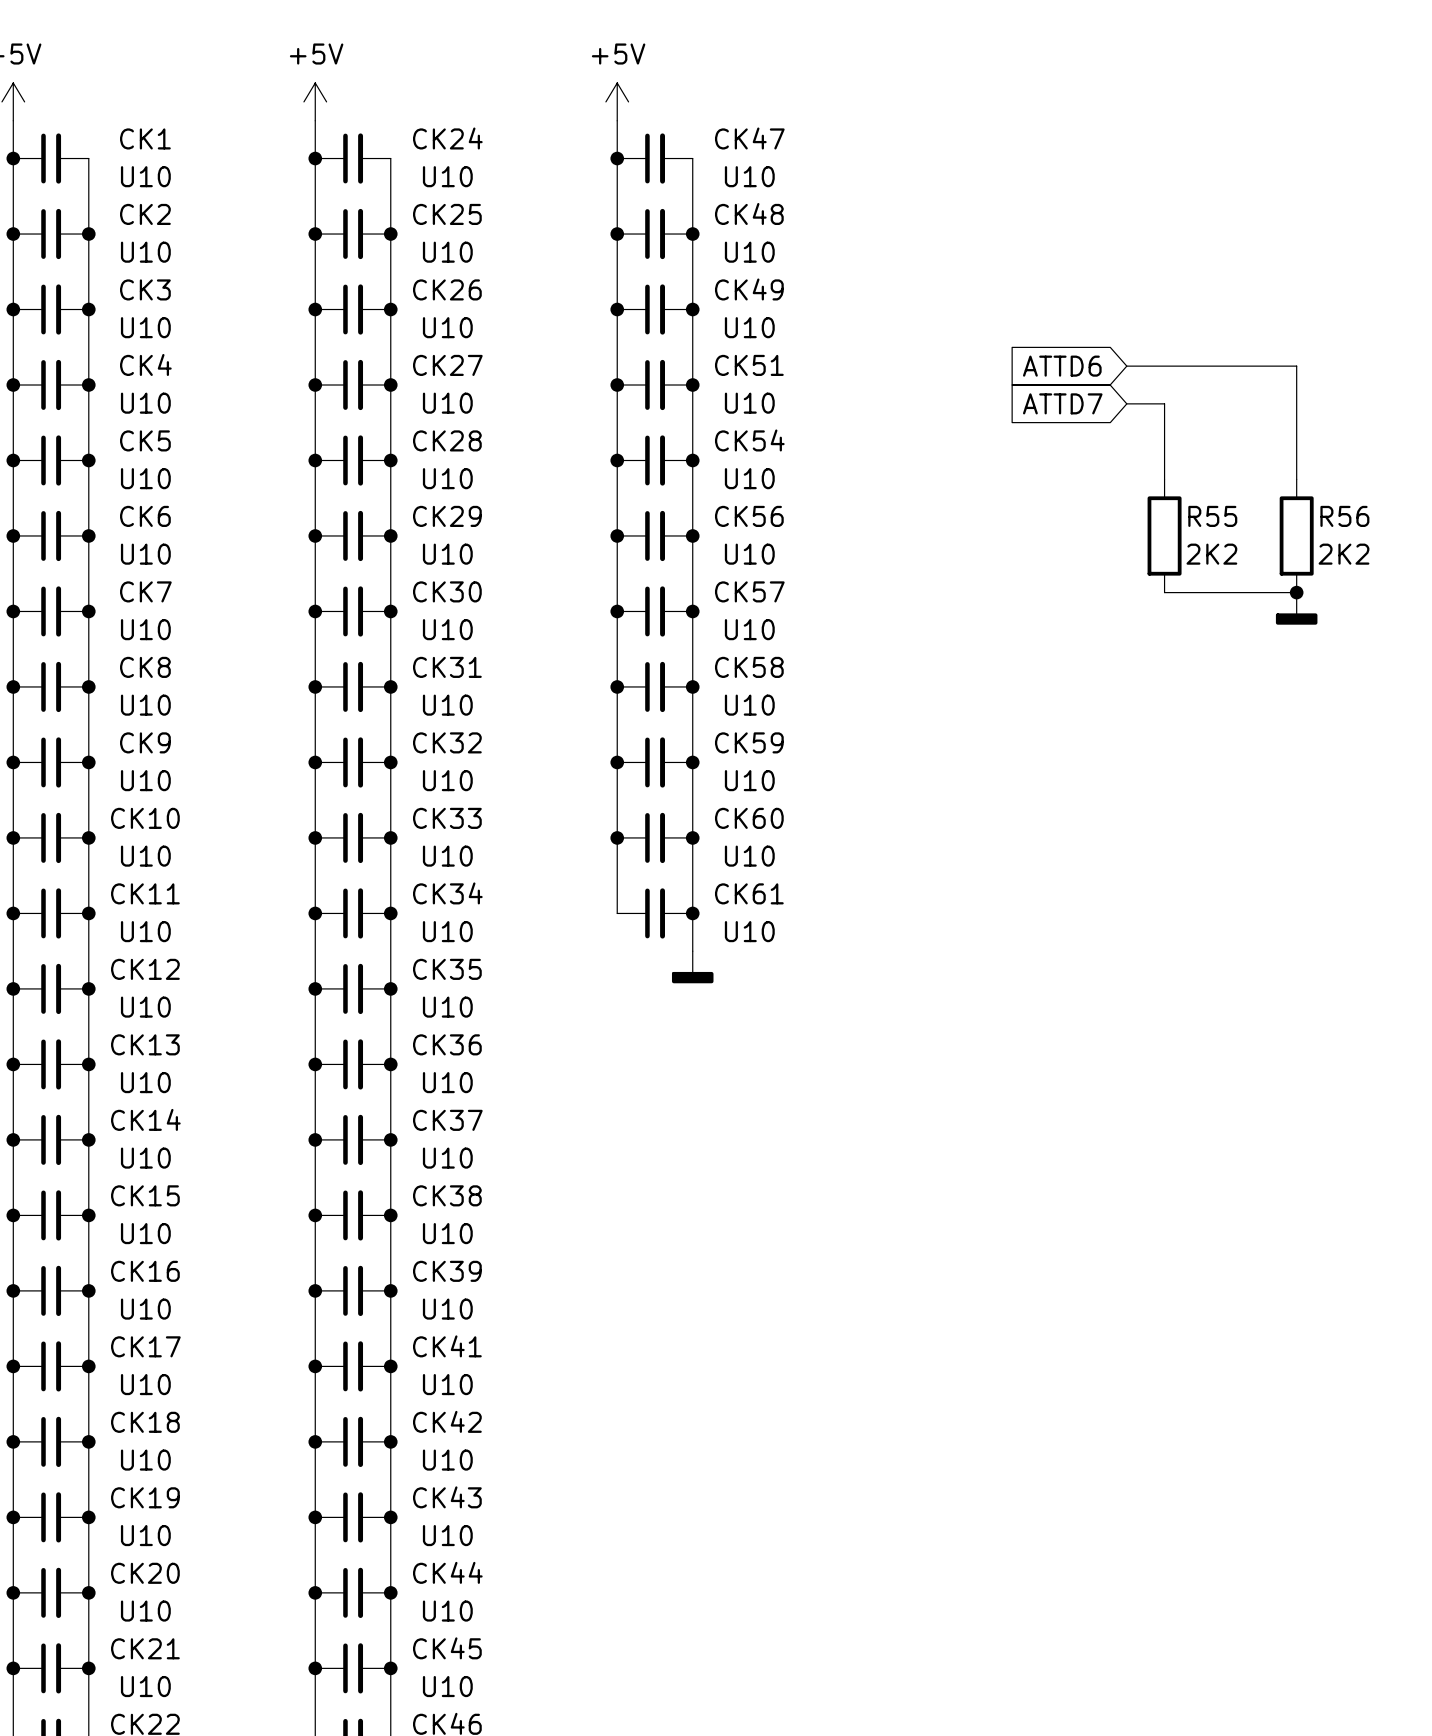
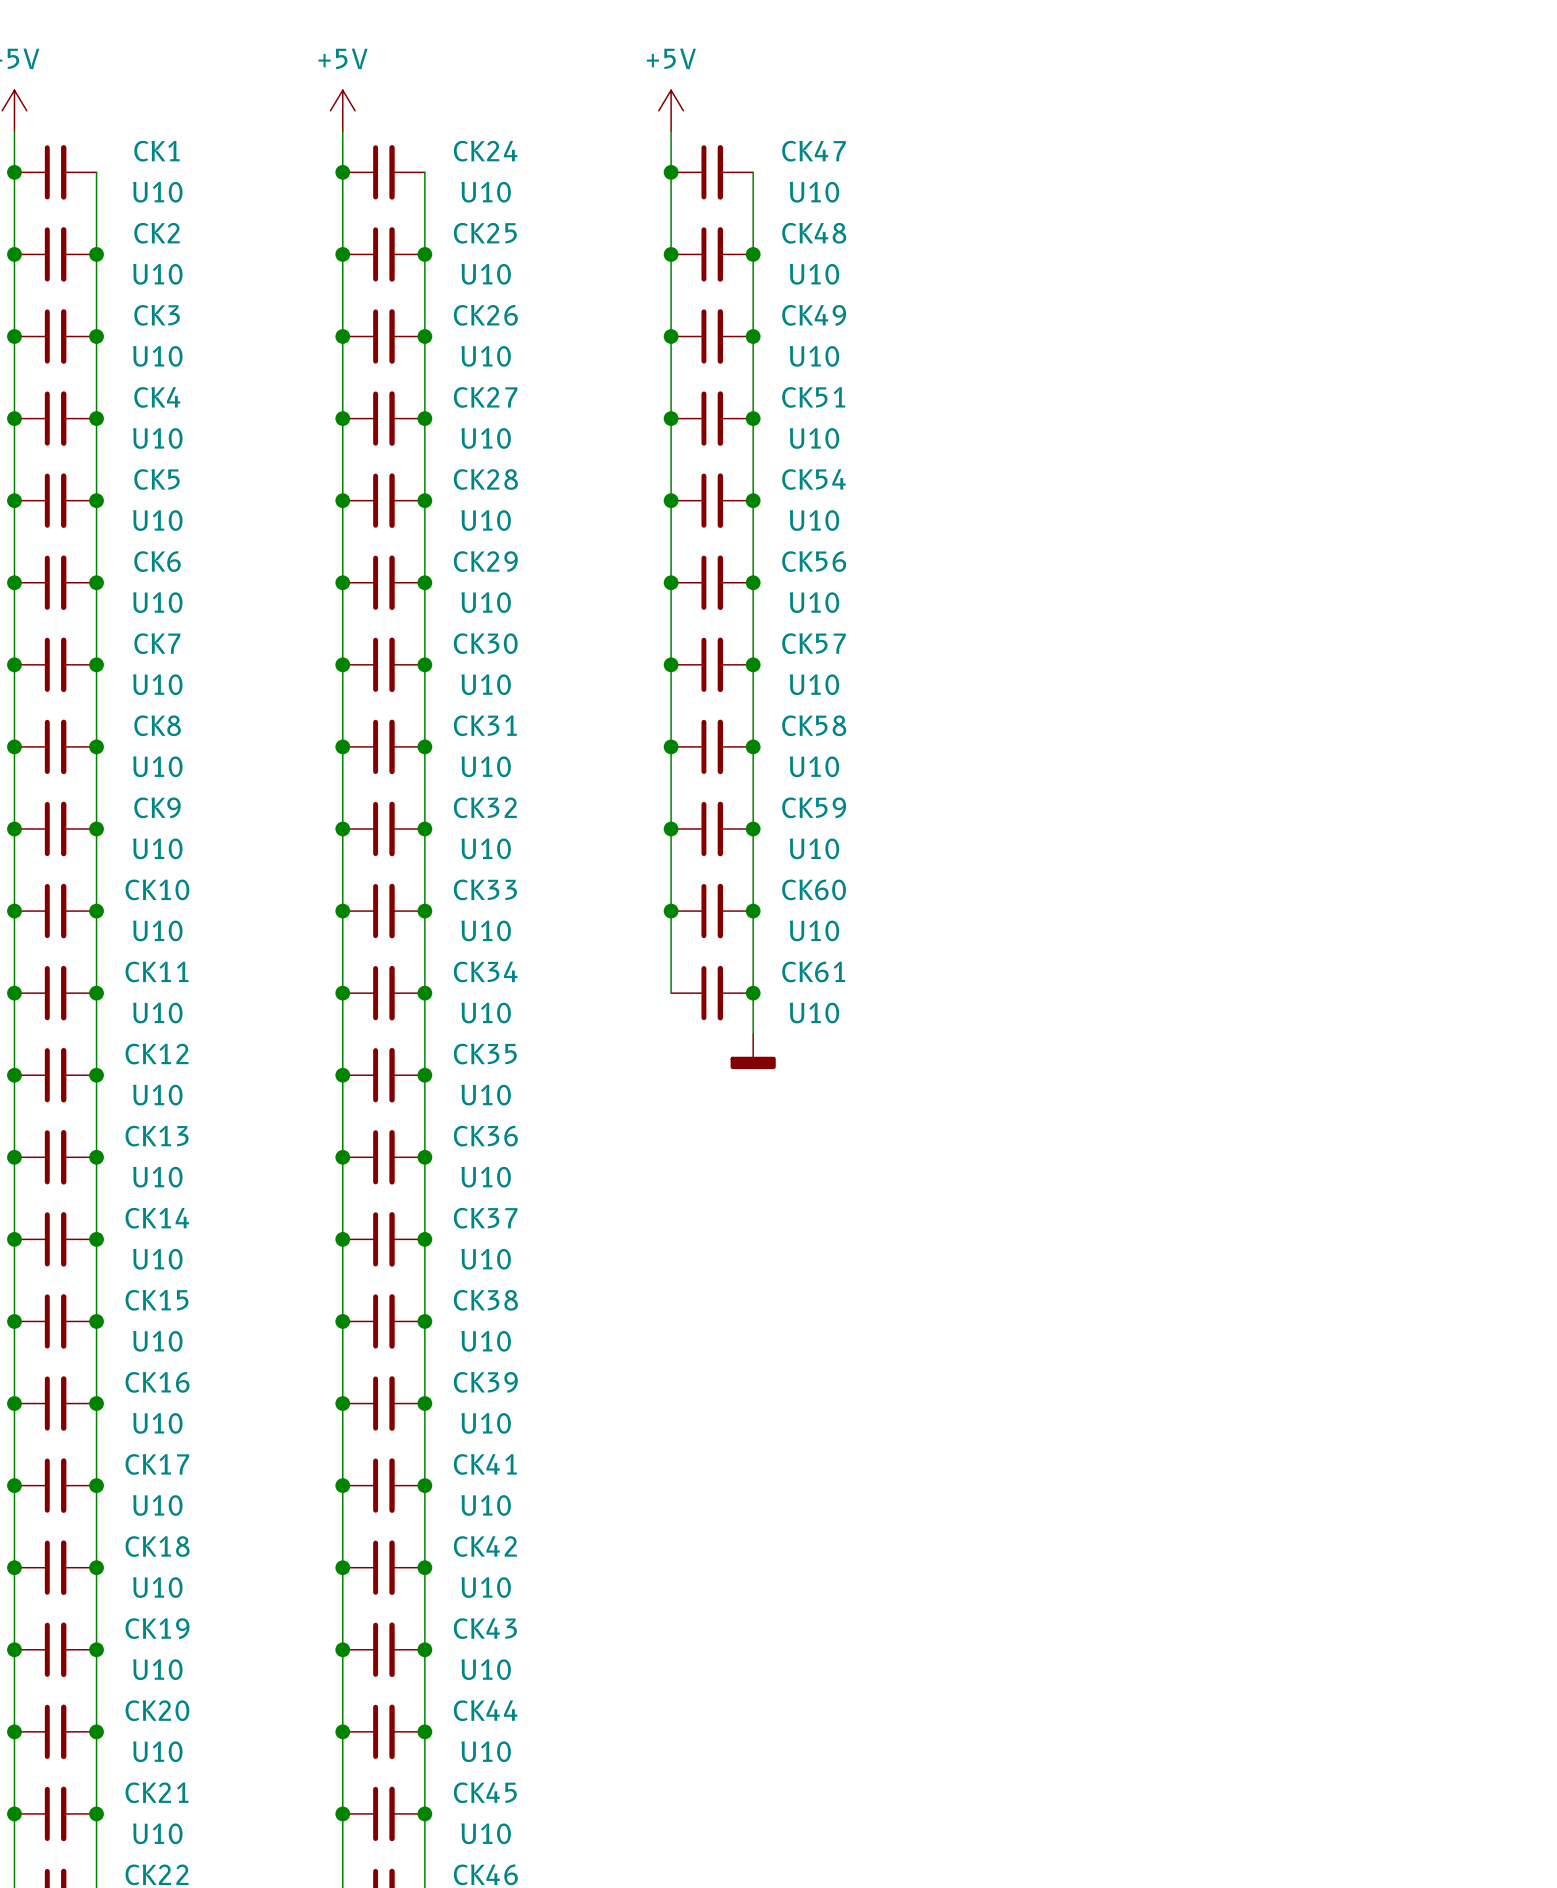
global label: ATTD6 (1062, 366) -> none
wire: (1126, 366) (1296, 366) (1296, 479) -> none
global label: ATTD7 (1062, 403) -> none
wire: (1126, 403) (1164, 403) (1164, 479) -> none
R55: 2K2 (1164, 535) -> none
R56: 2K2 (1296, 535) -> none
wire: (1164, 592) (1296, 592) -> none
junction: (1296, 592) -> none
power symbol: (1296, 608) -> none

